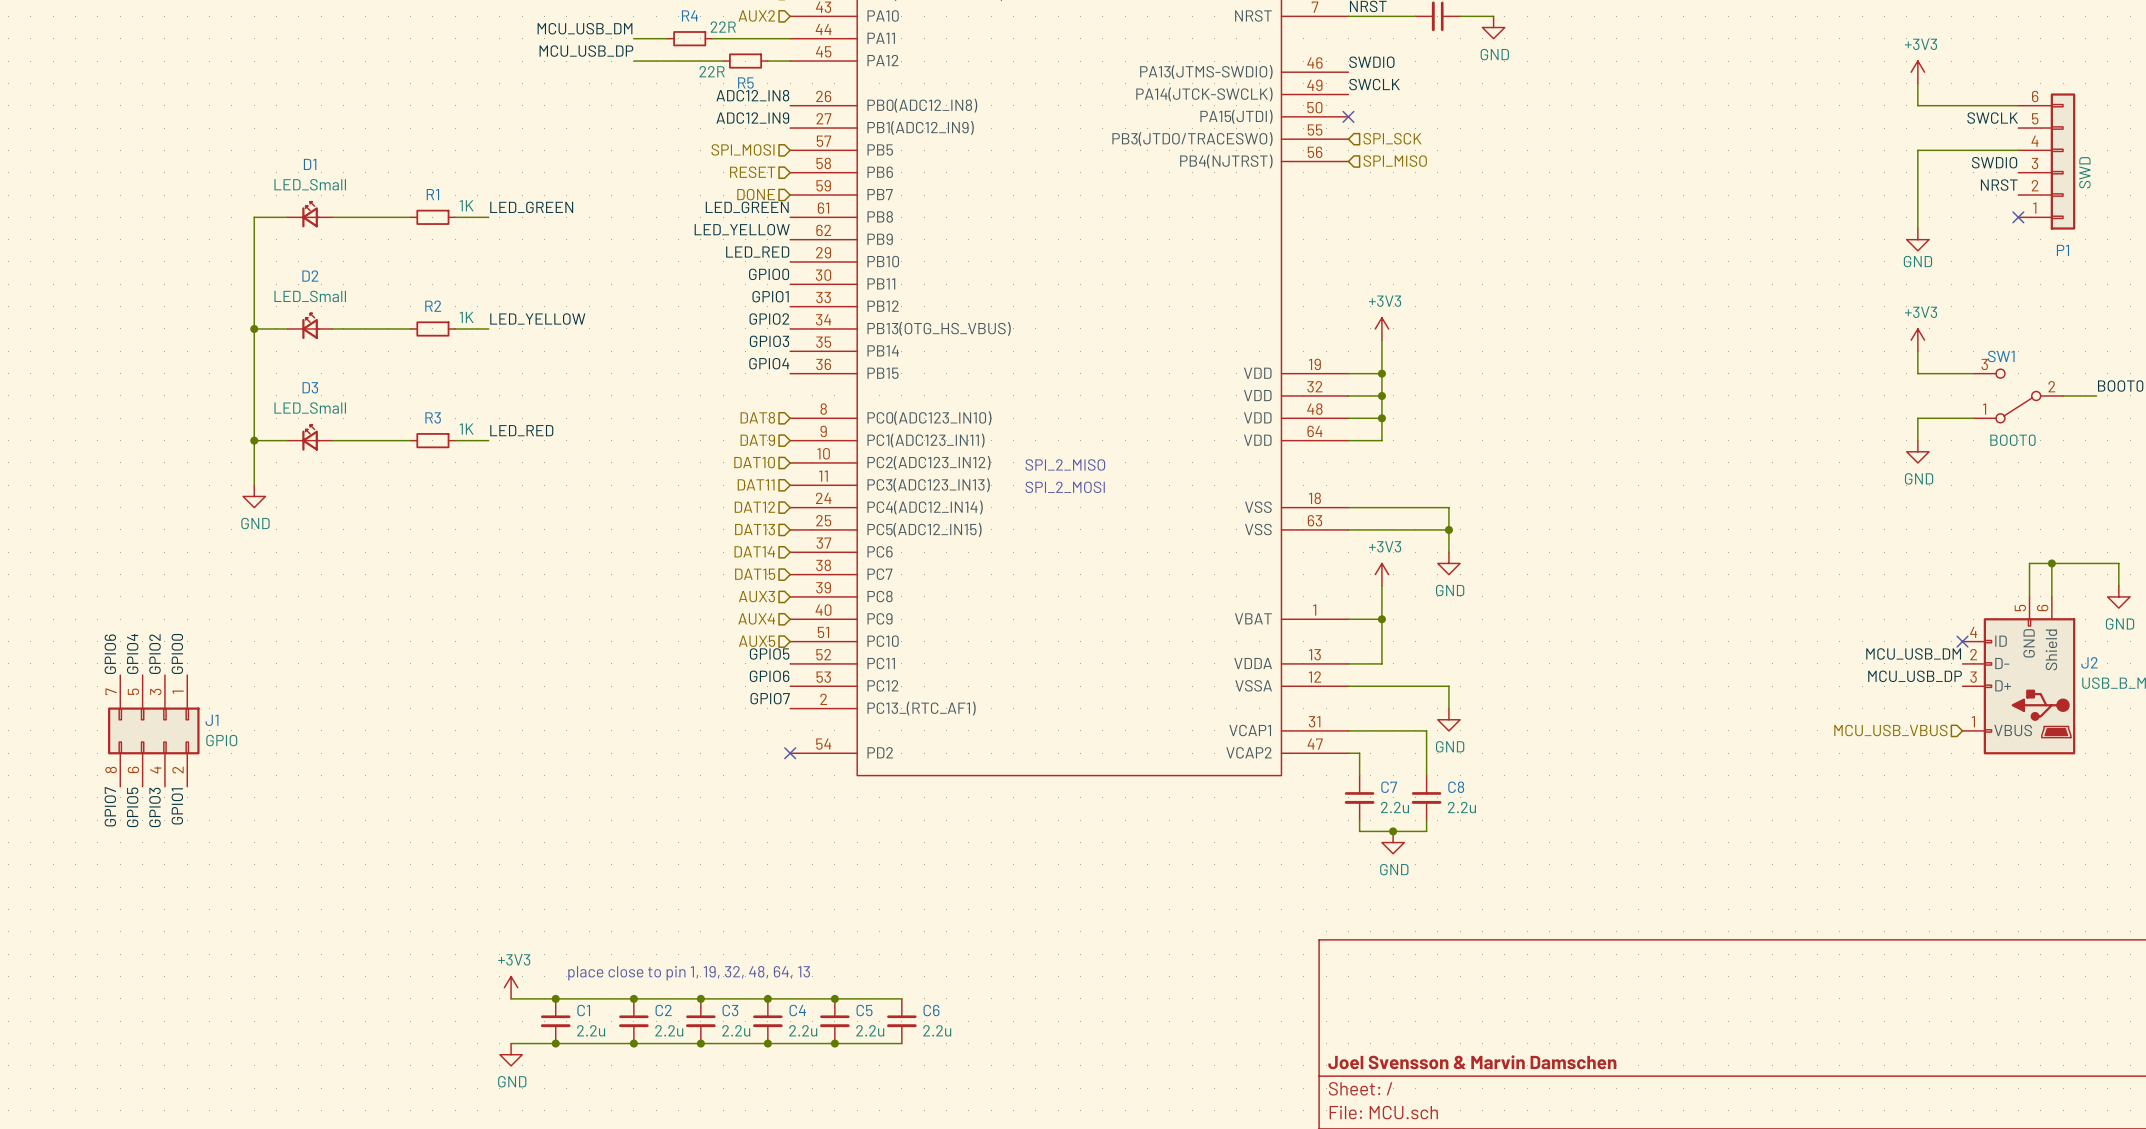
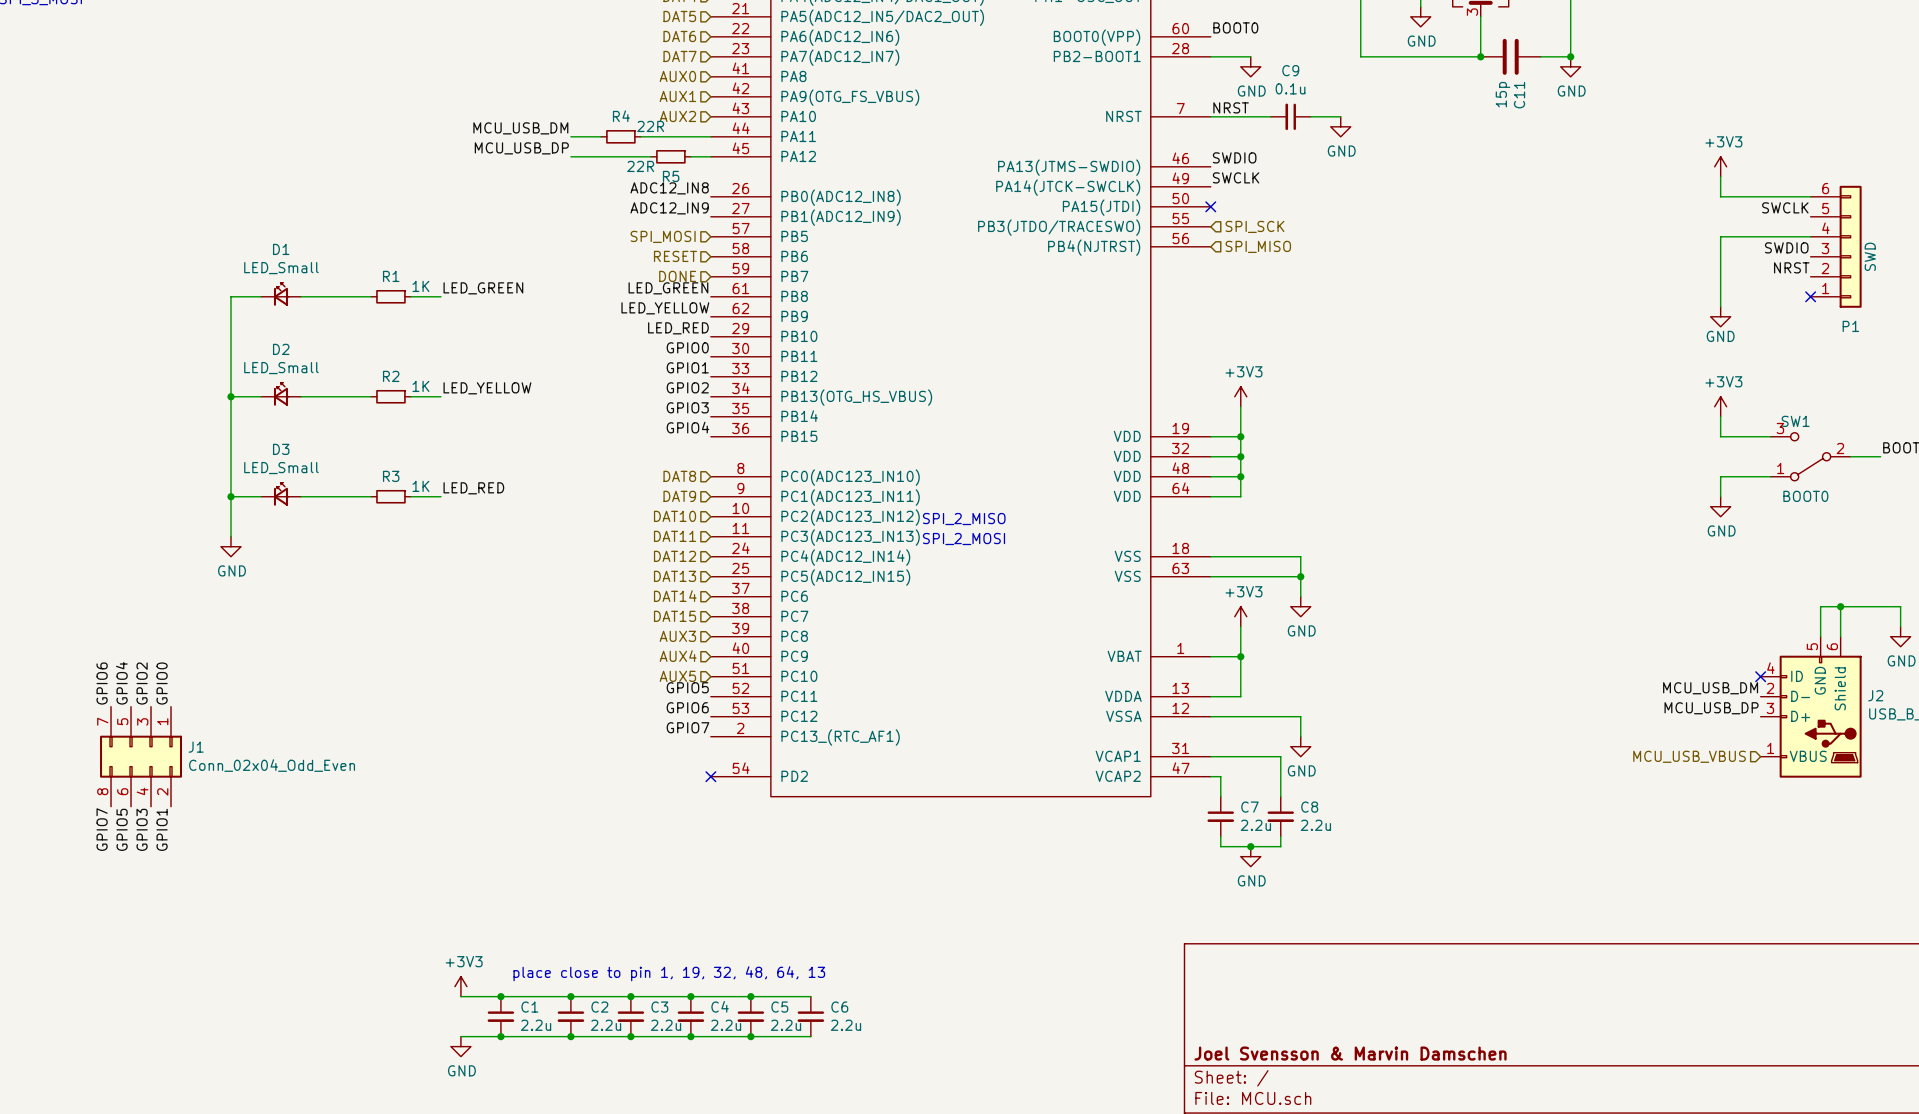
J1 value: GPIO (221, 740) -> Conn_02x04_Odd_Even (272, 765)

